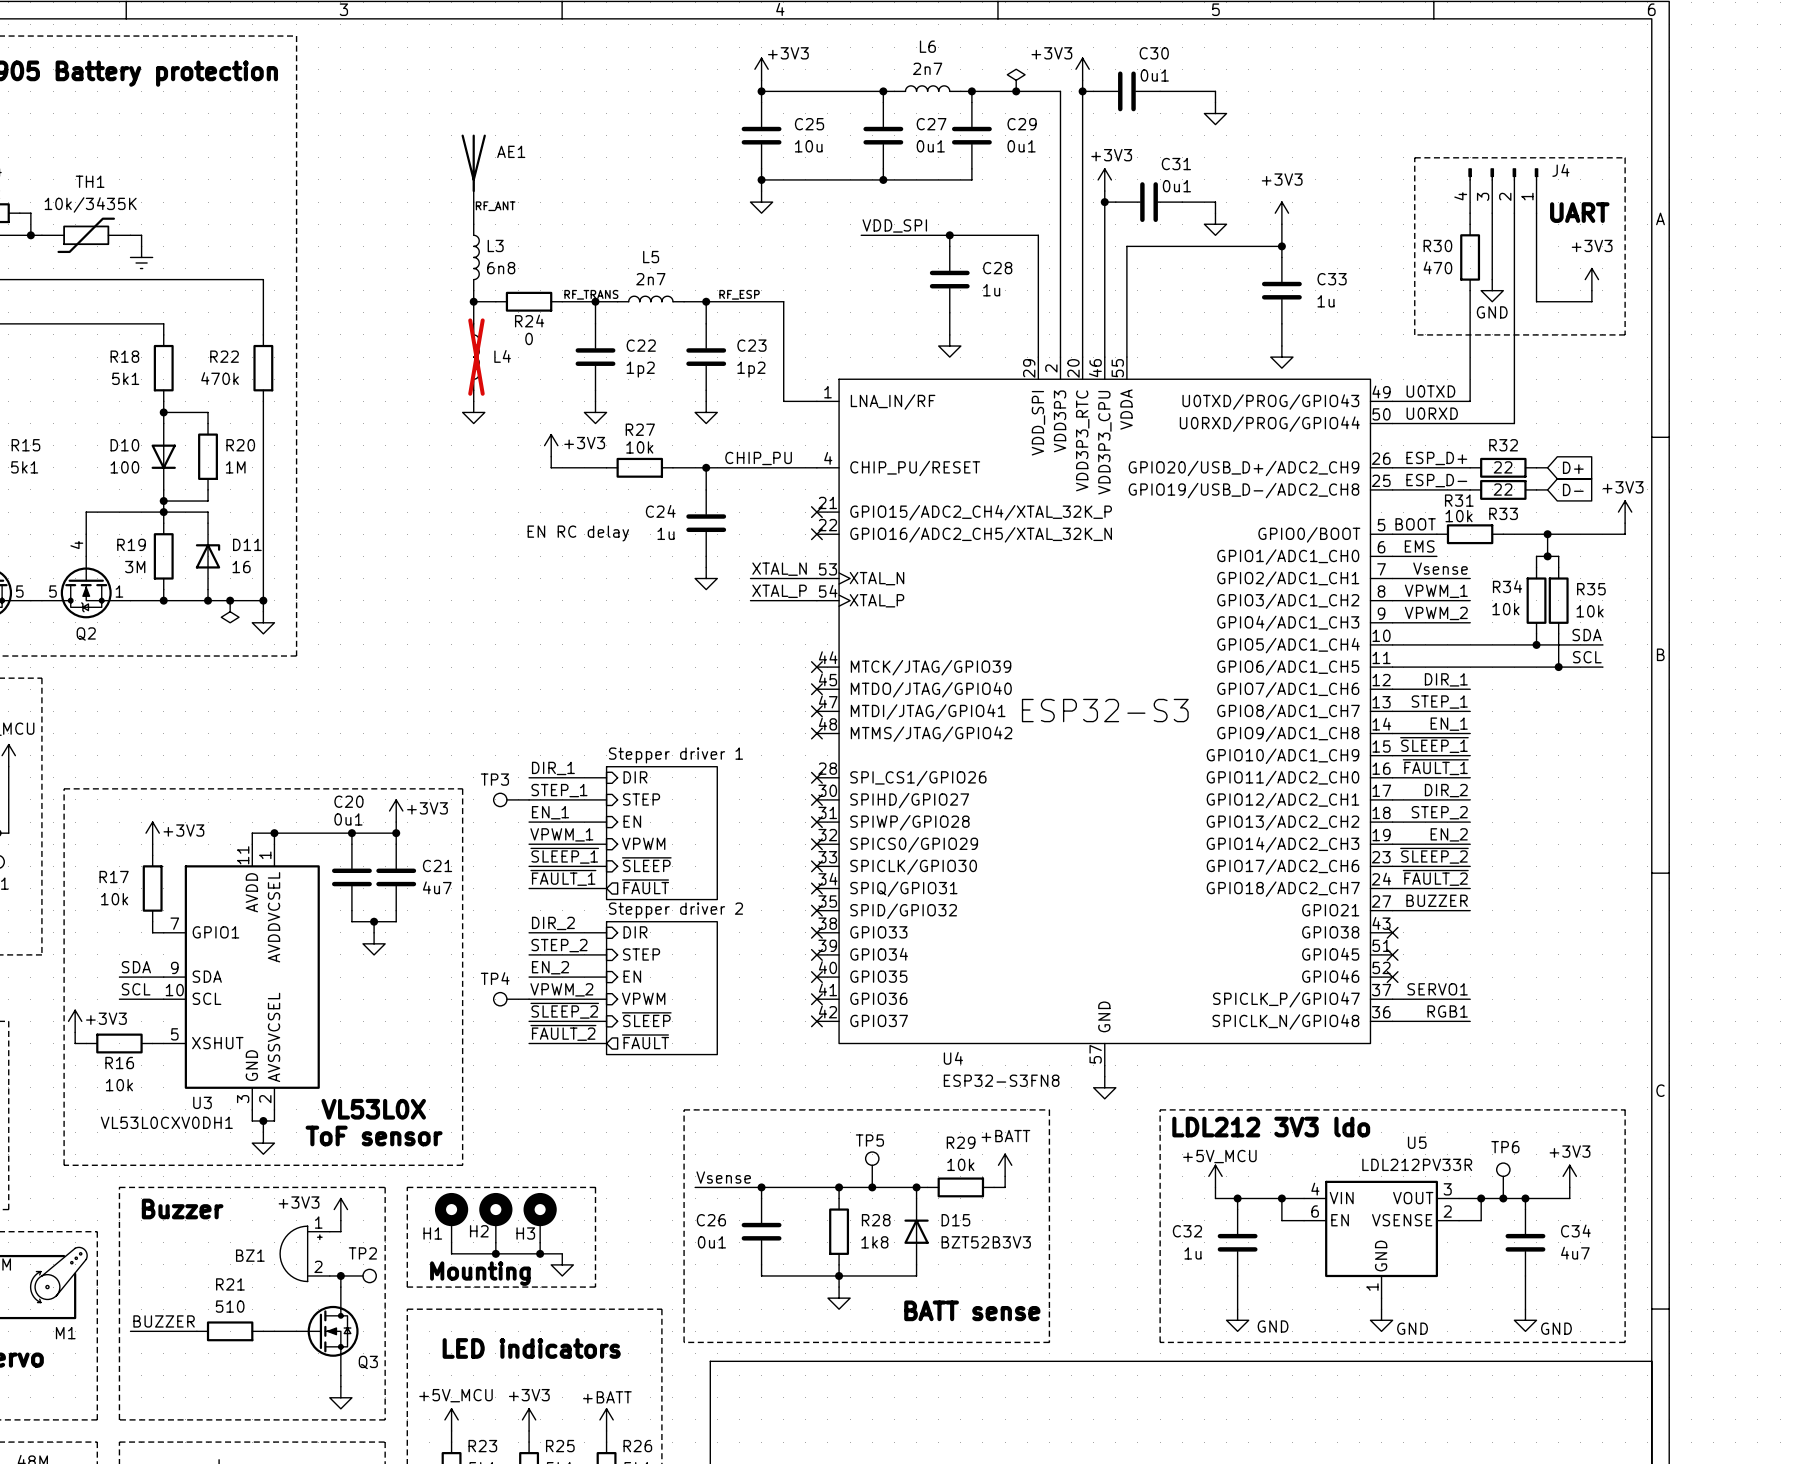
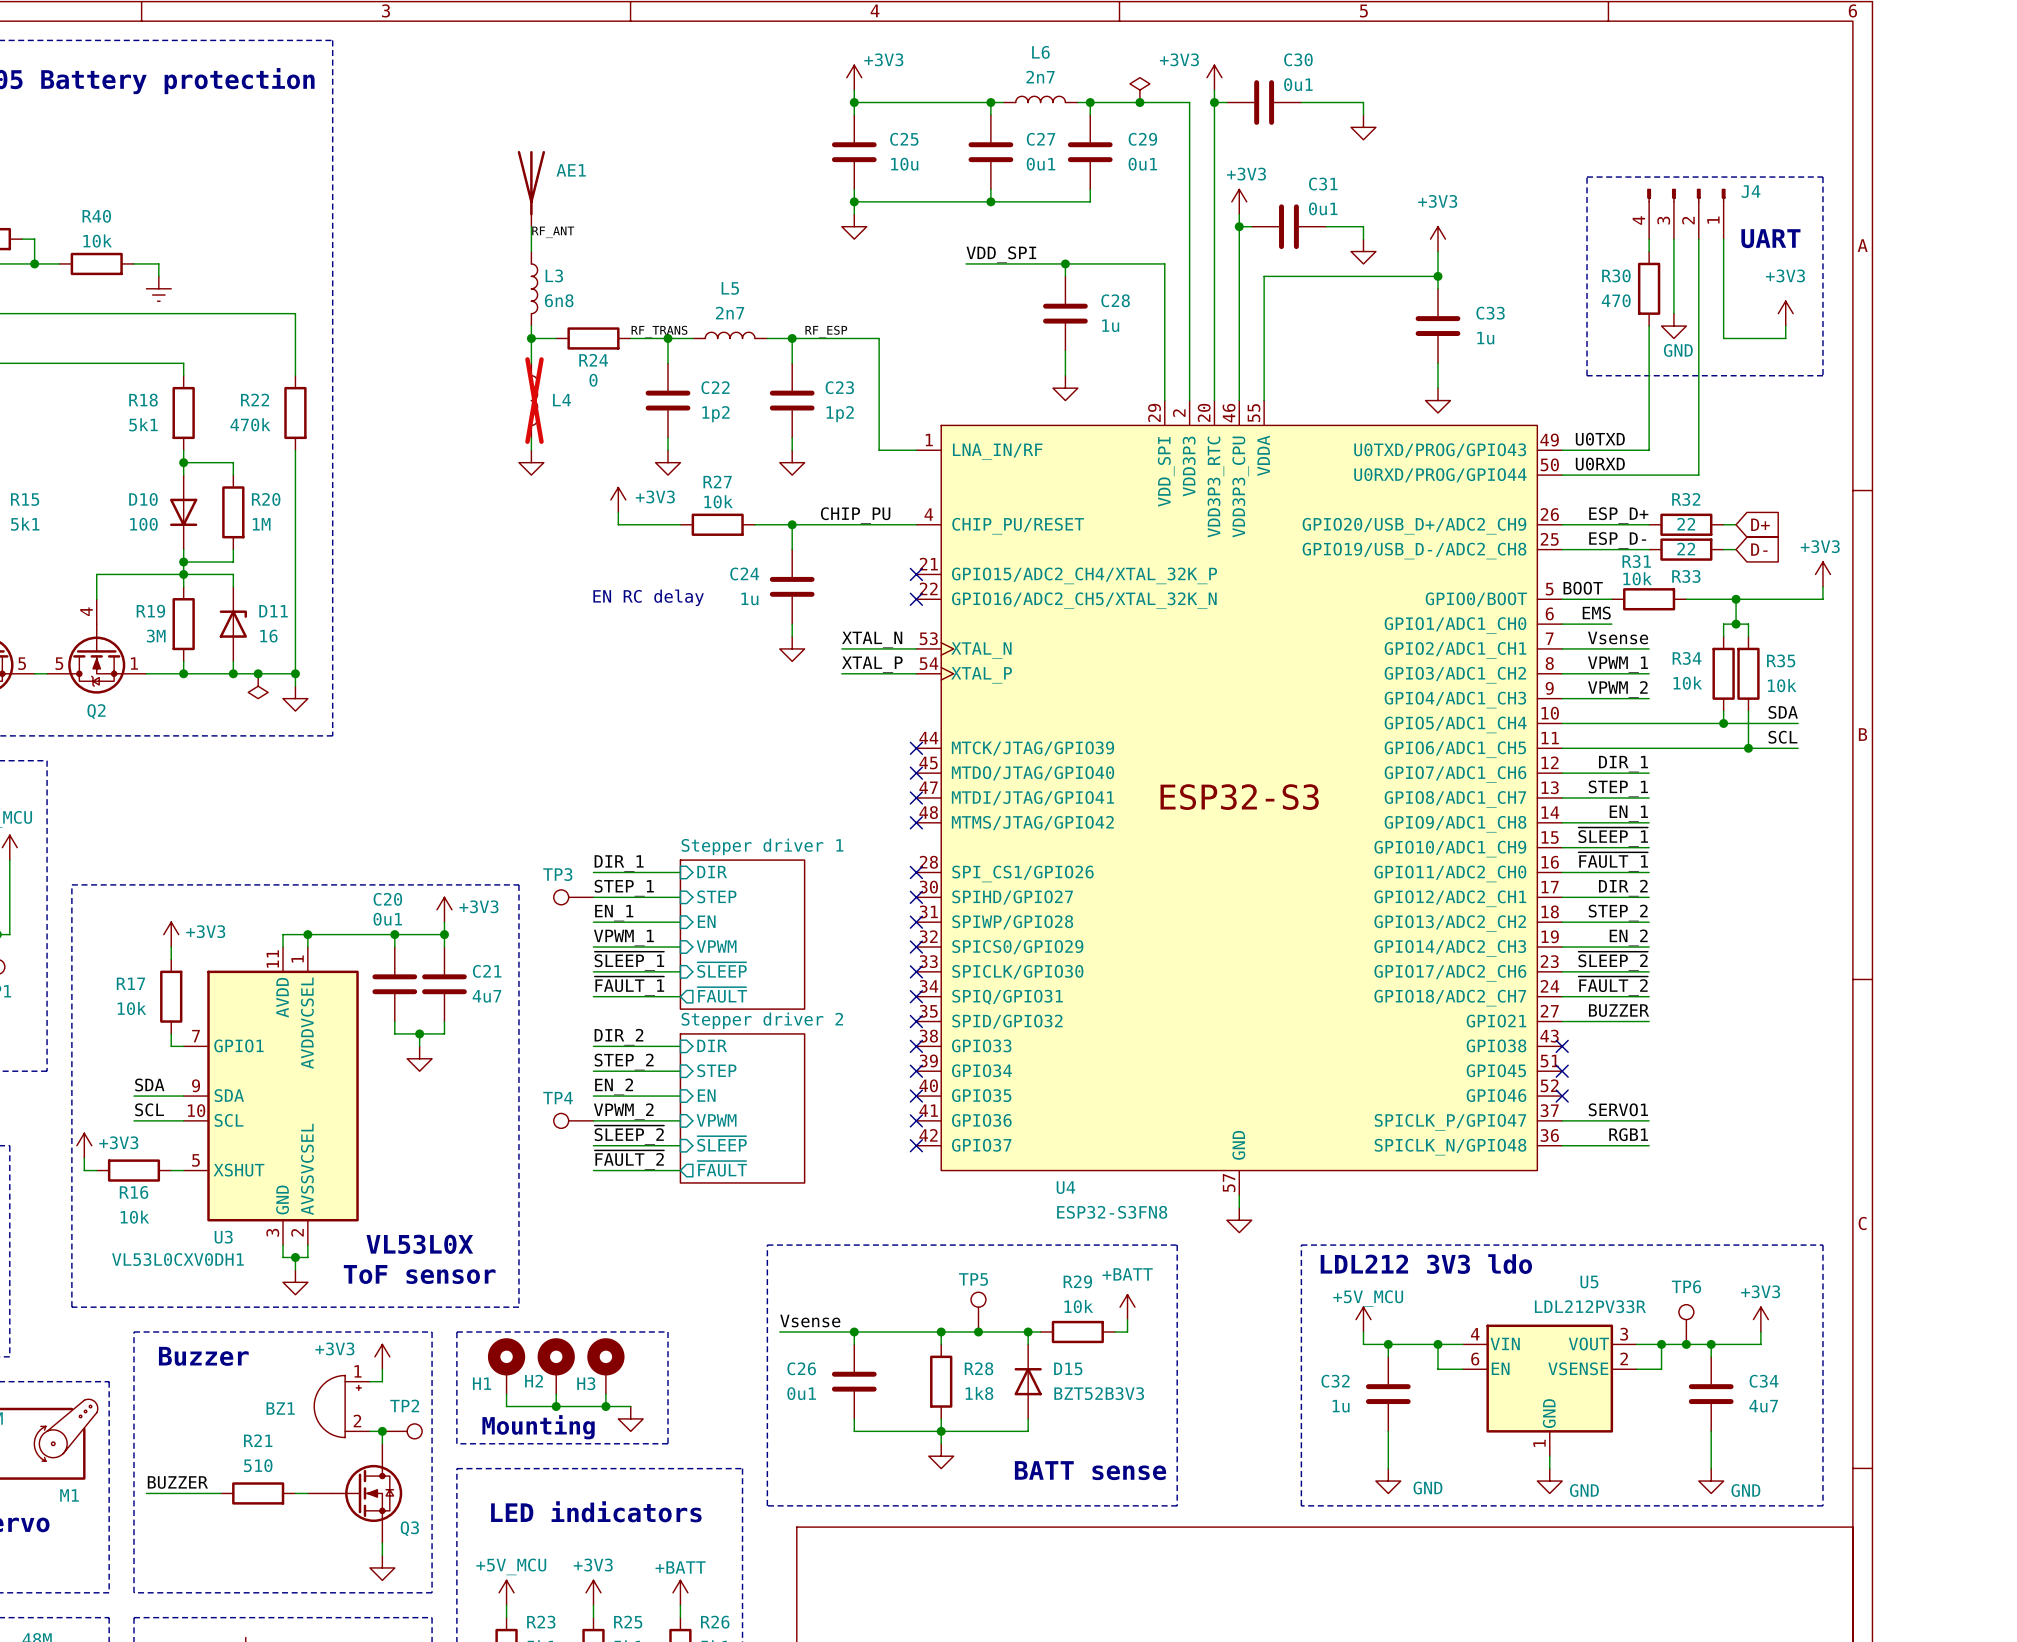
TH1: 10k/3435K (86, 235) -> none
R40: none -> 10k (96, 263)

